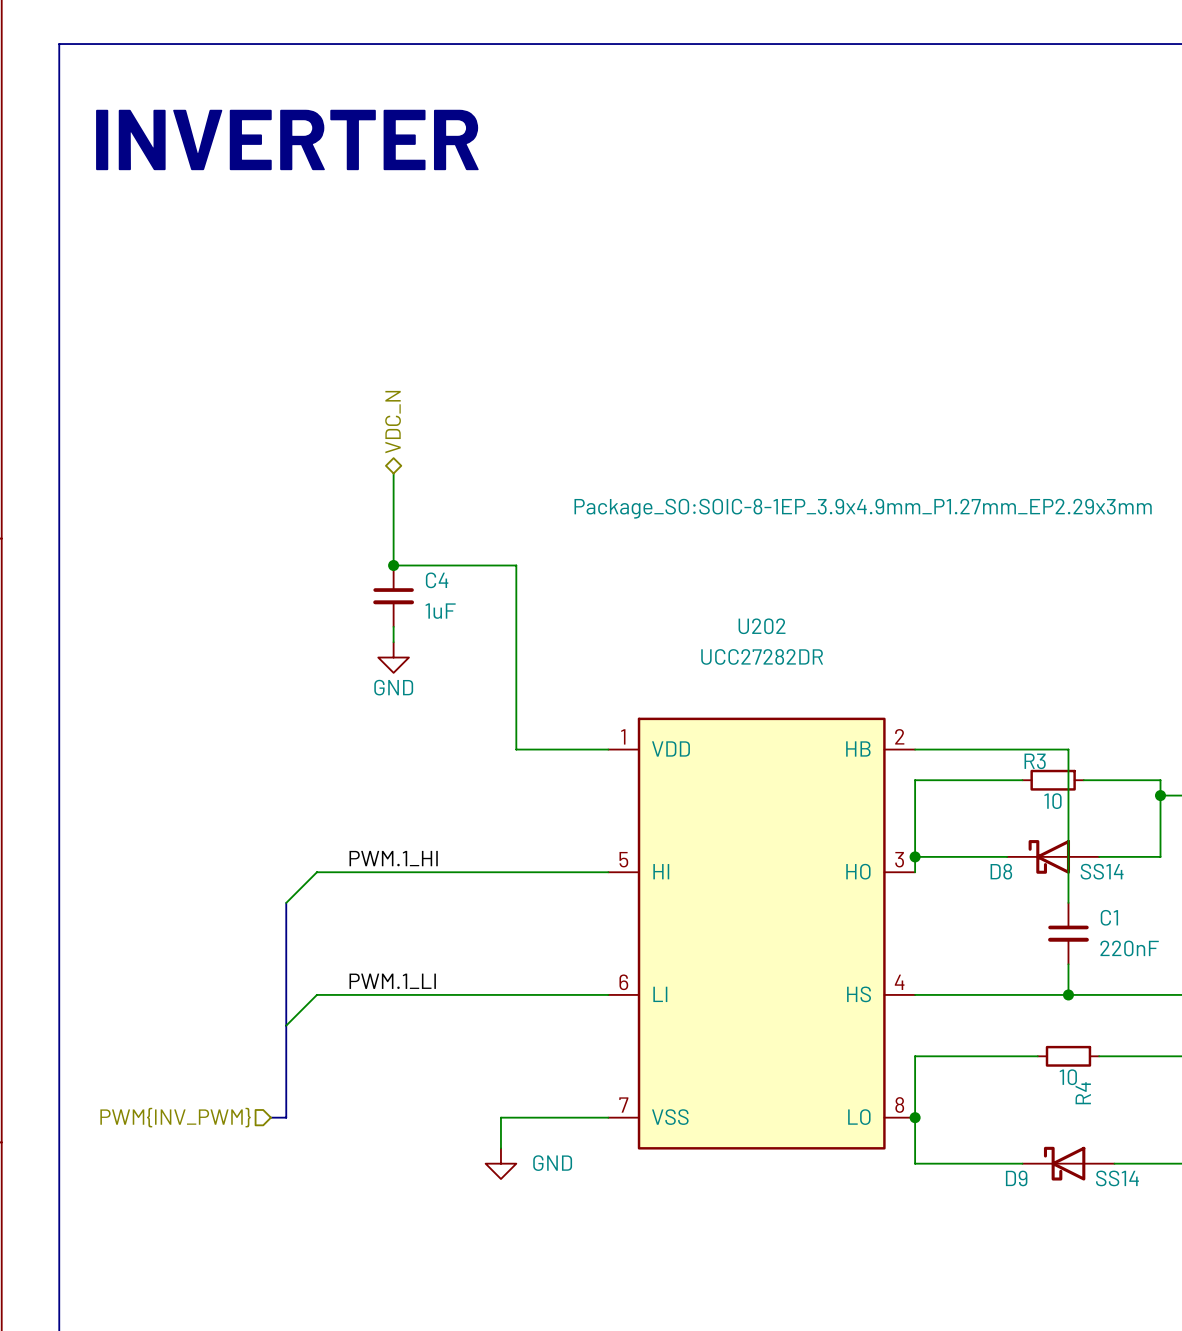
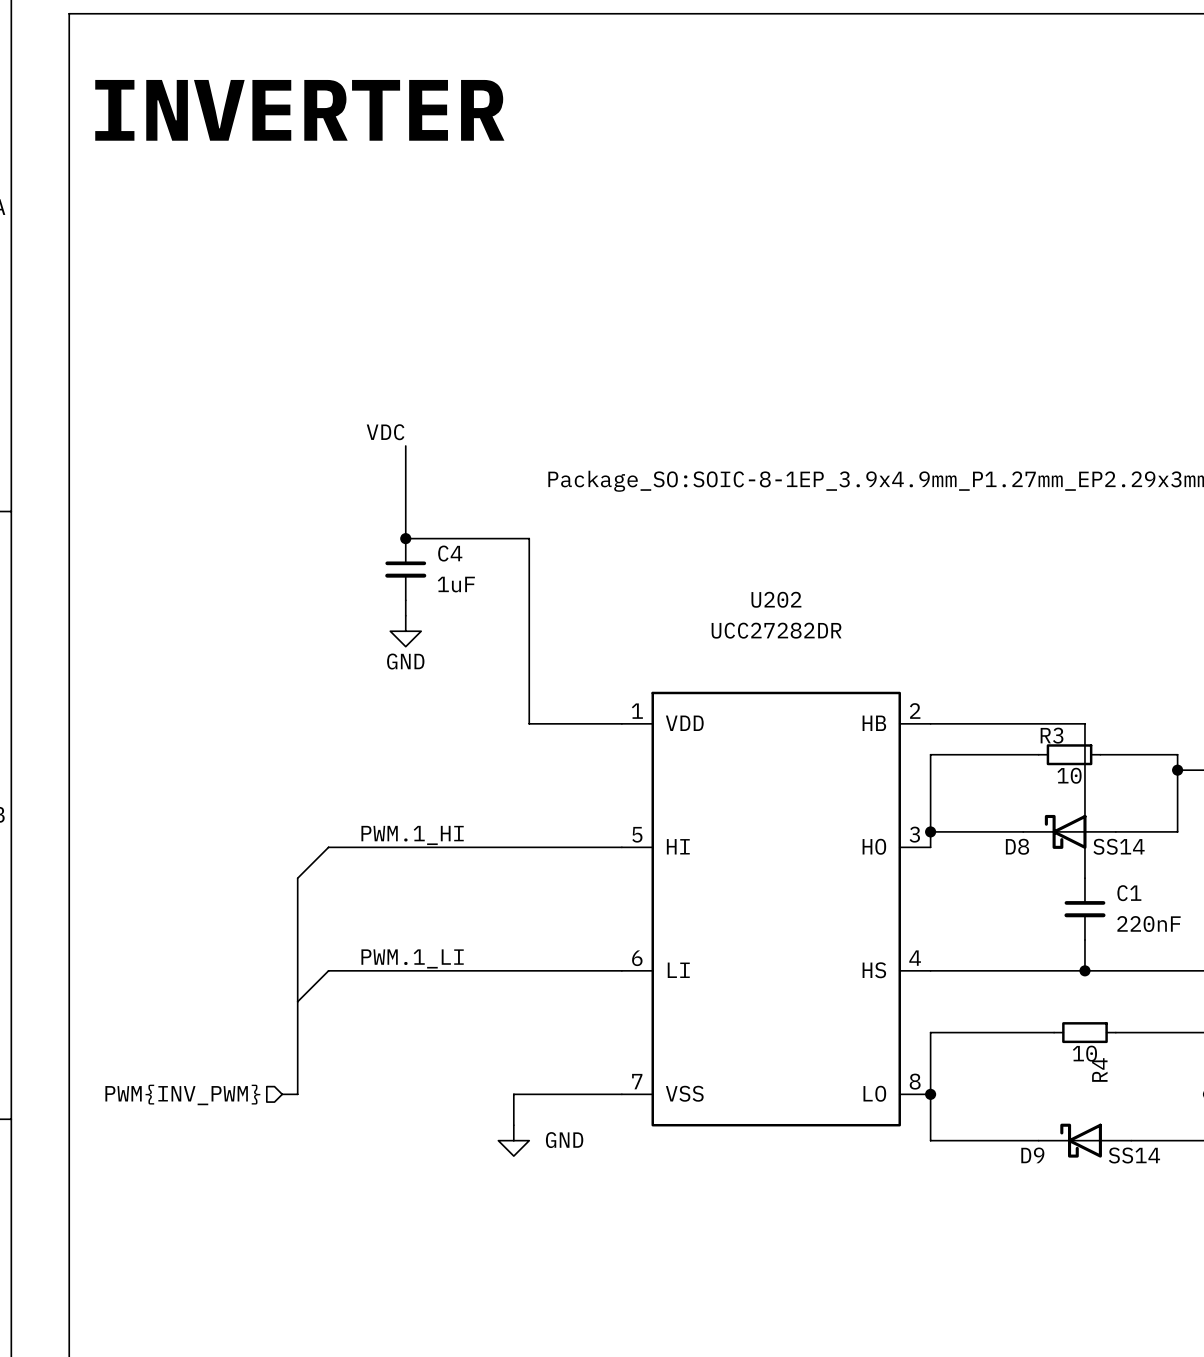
hierarchical label: VDC_N (393, 422) -> none
label: none -> VDC (385, 432)

